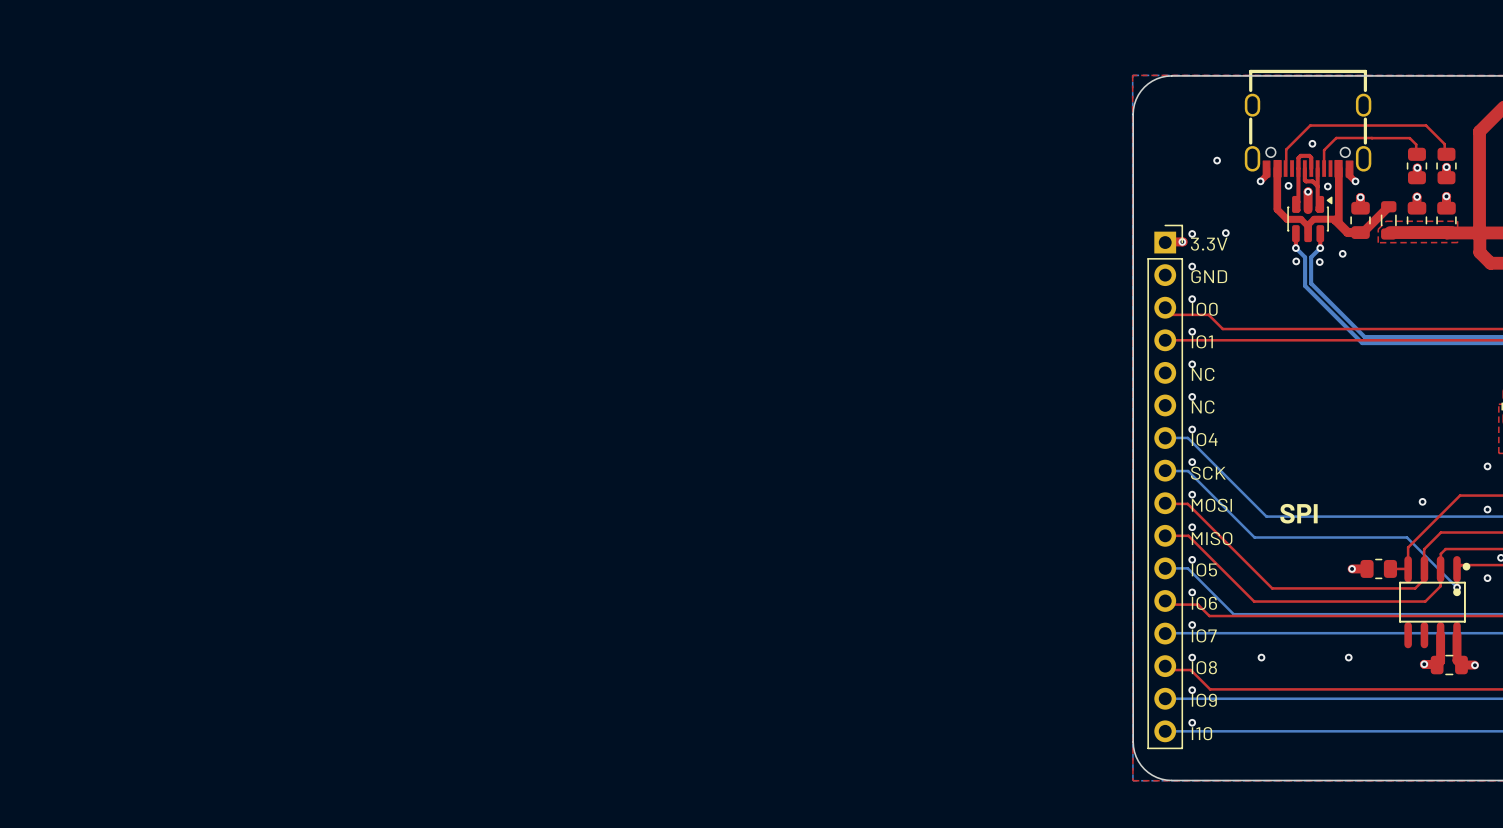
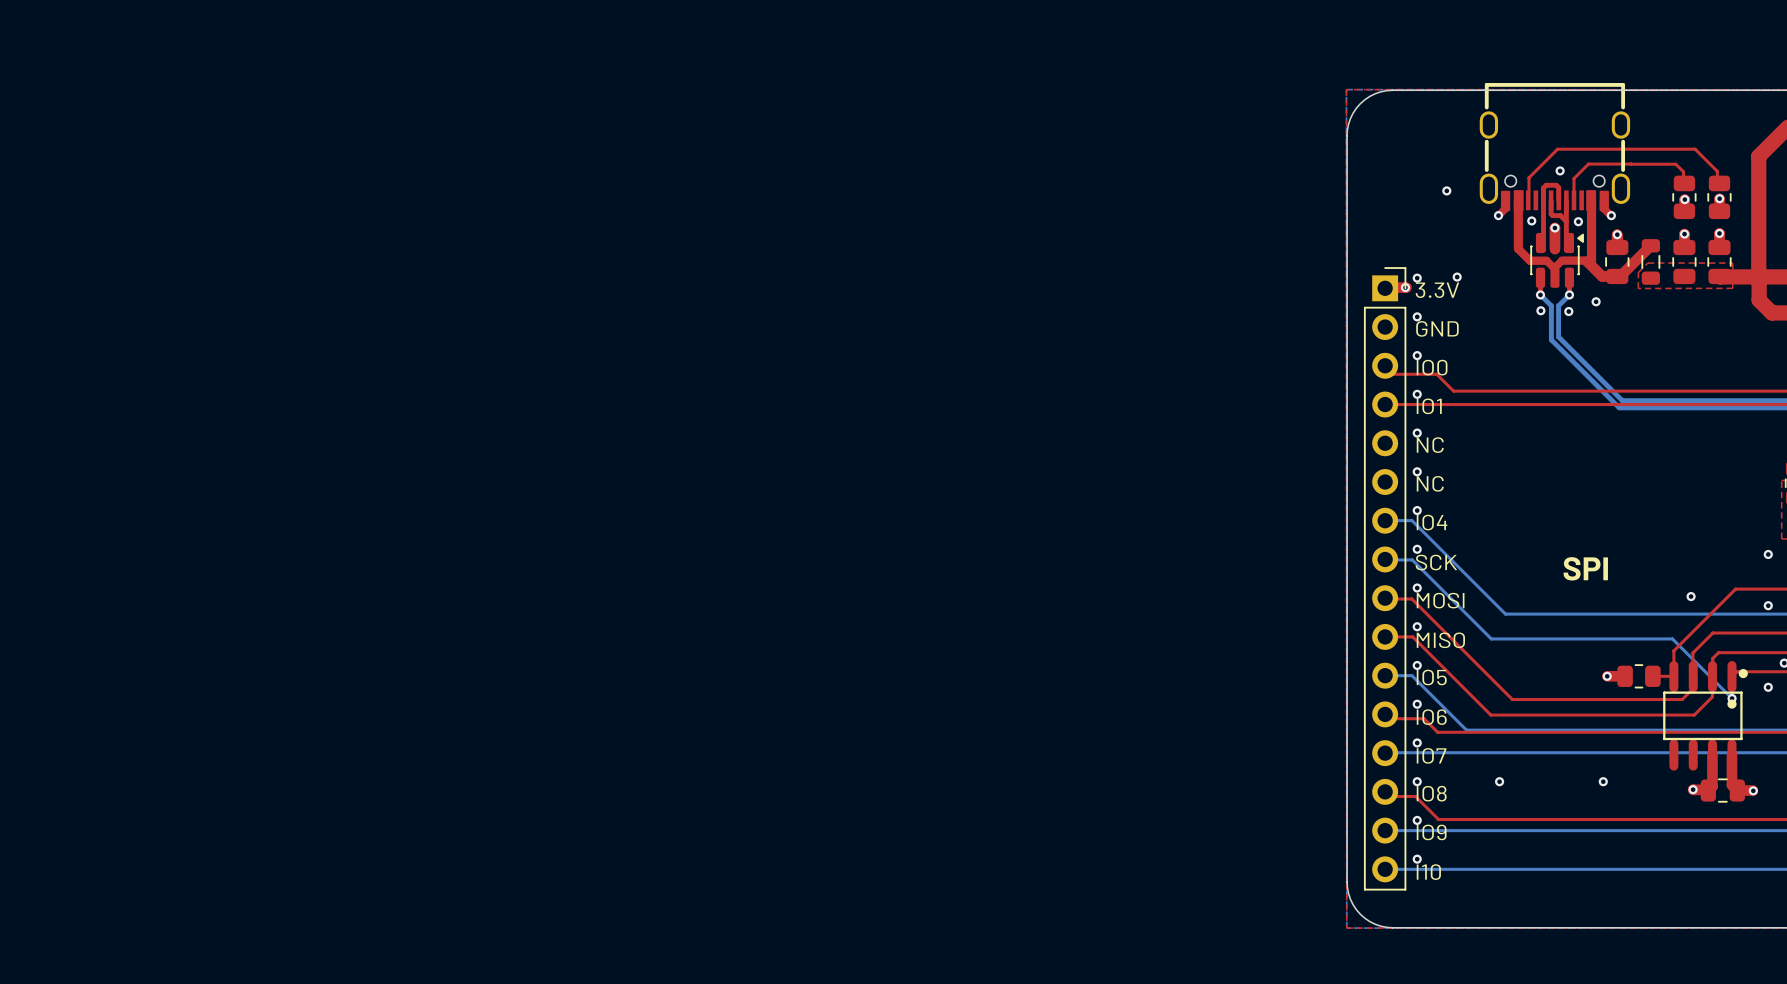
top track: (1446, 232) (1388, 234) -> none
text position: SPI (1298, 513) -> SPI (1585, 568)

